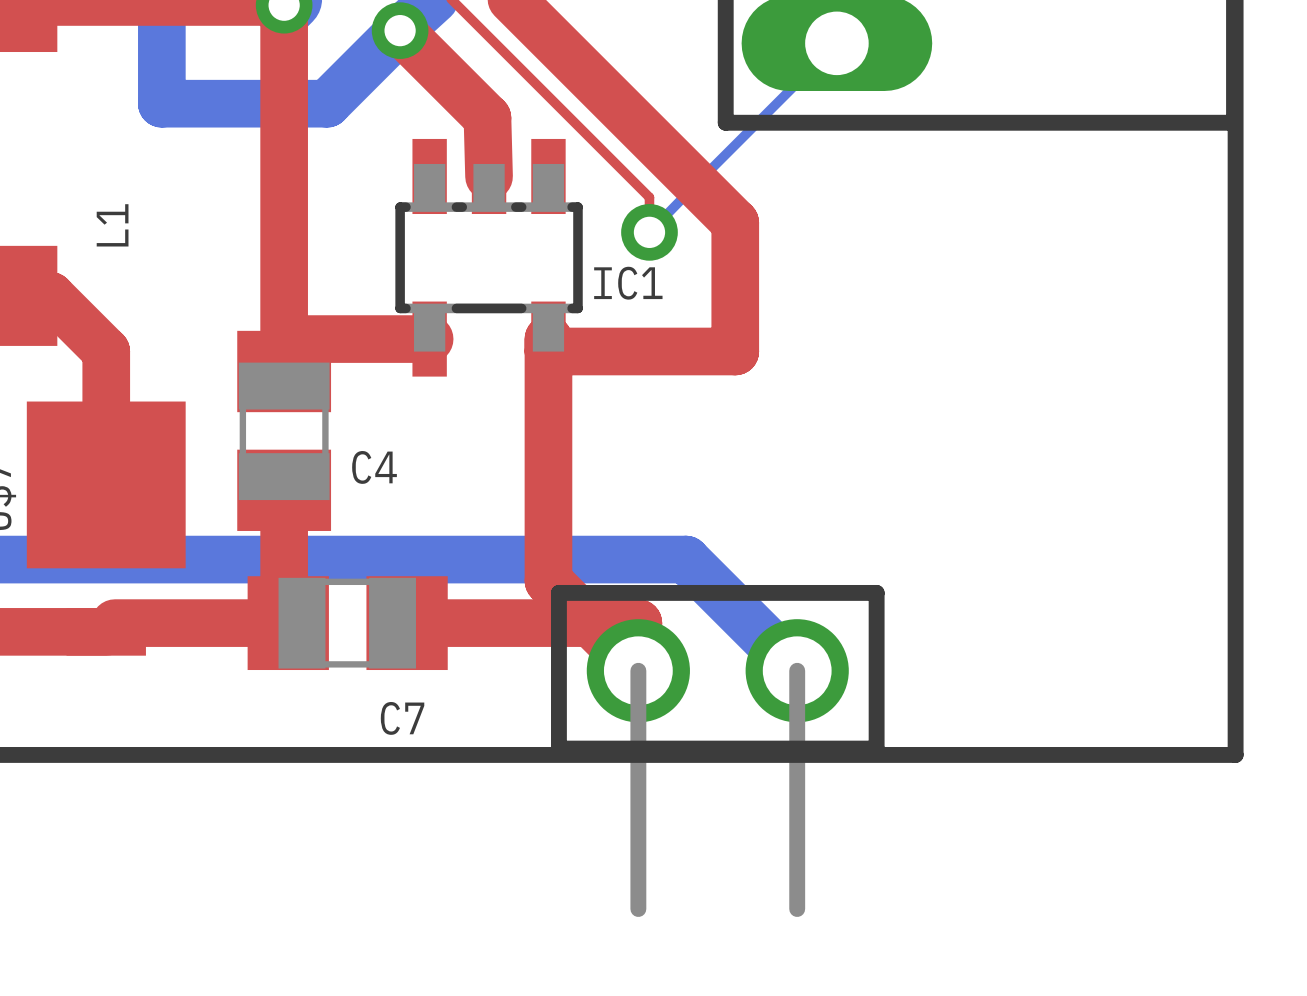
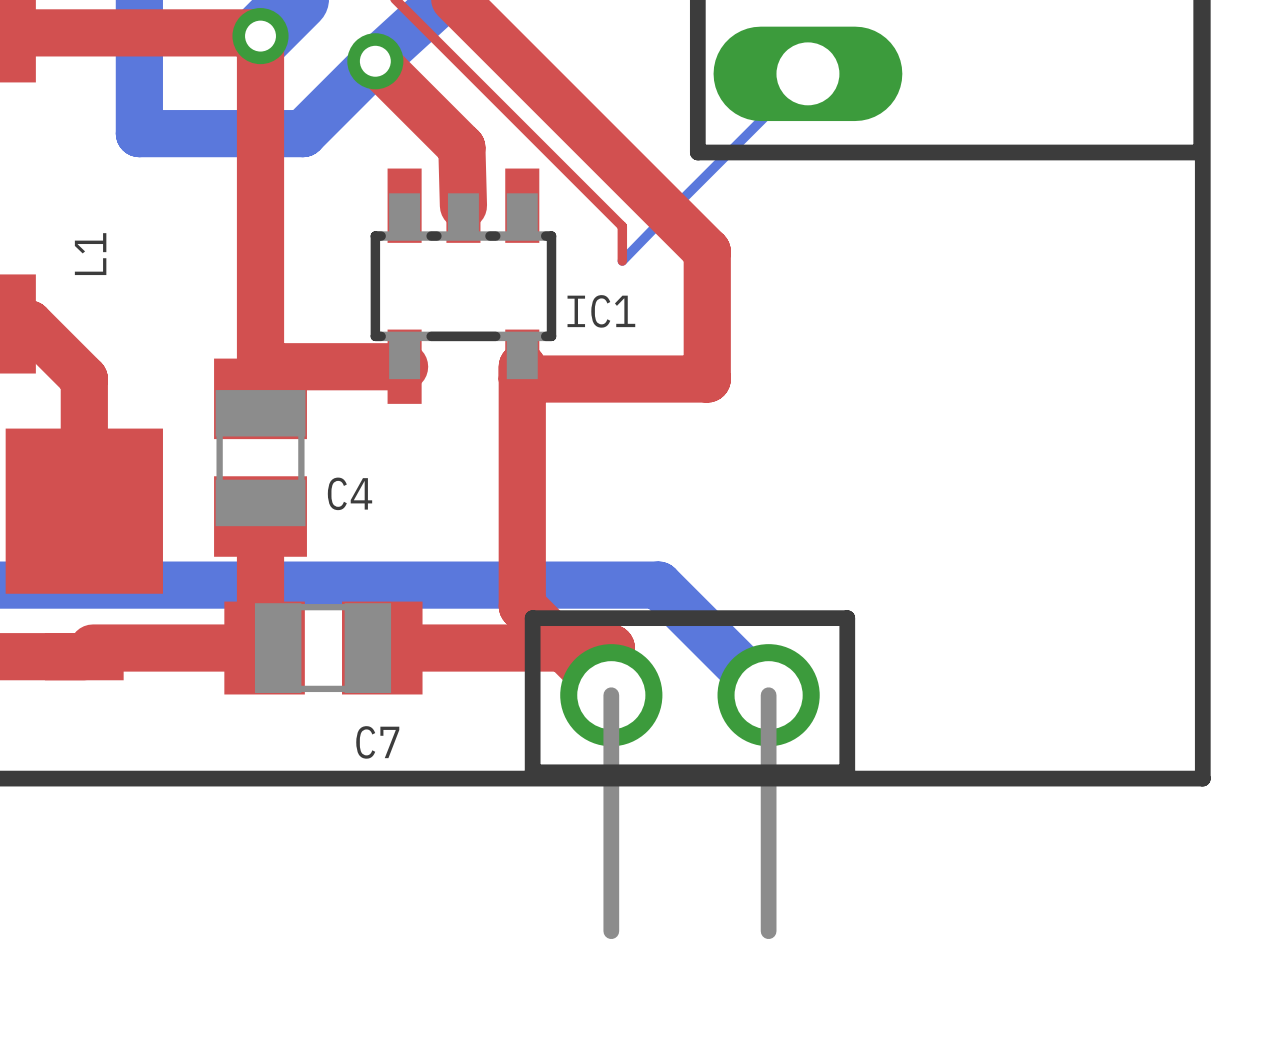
via: (649, 232) -> none

